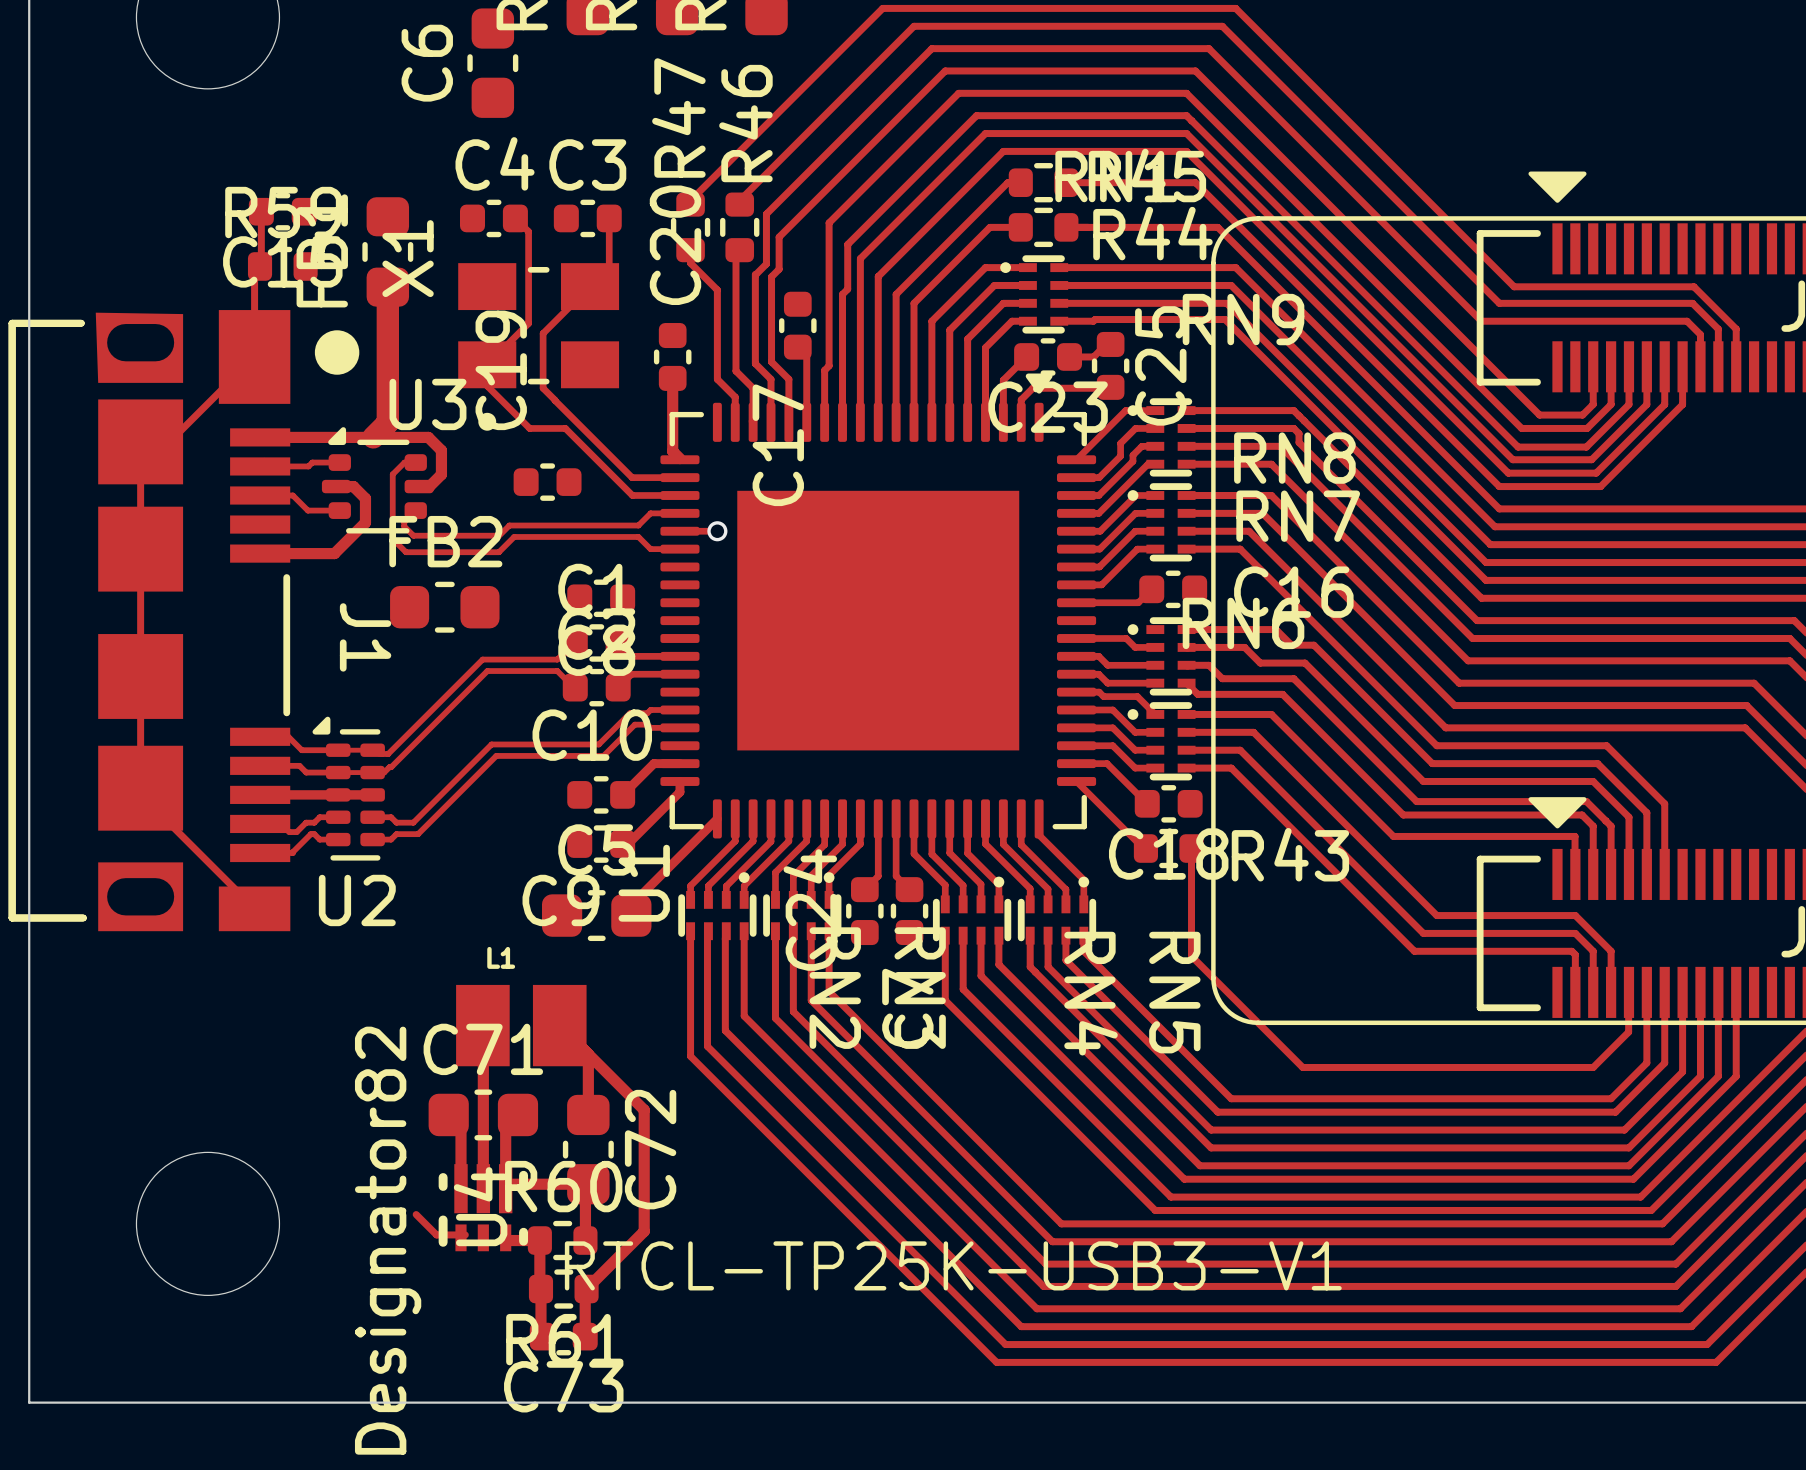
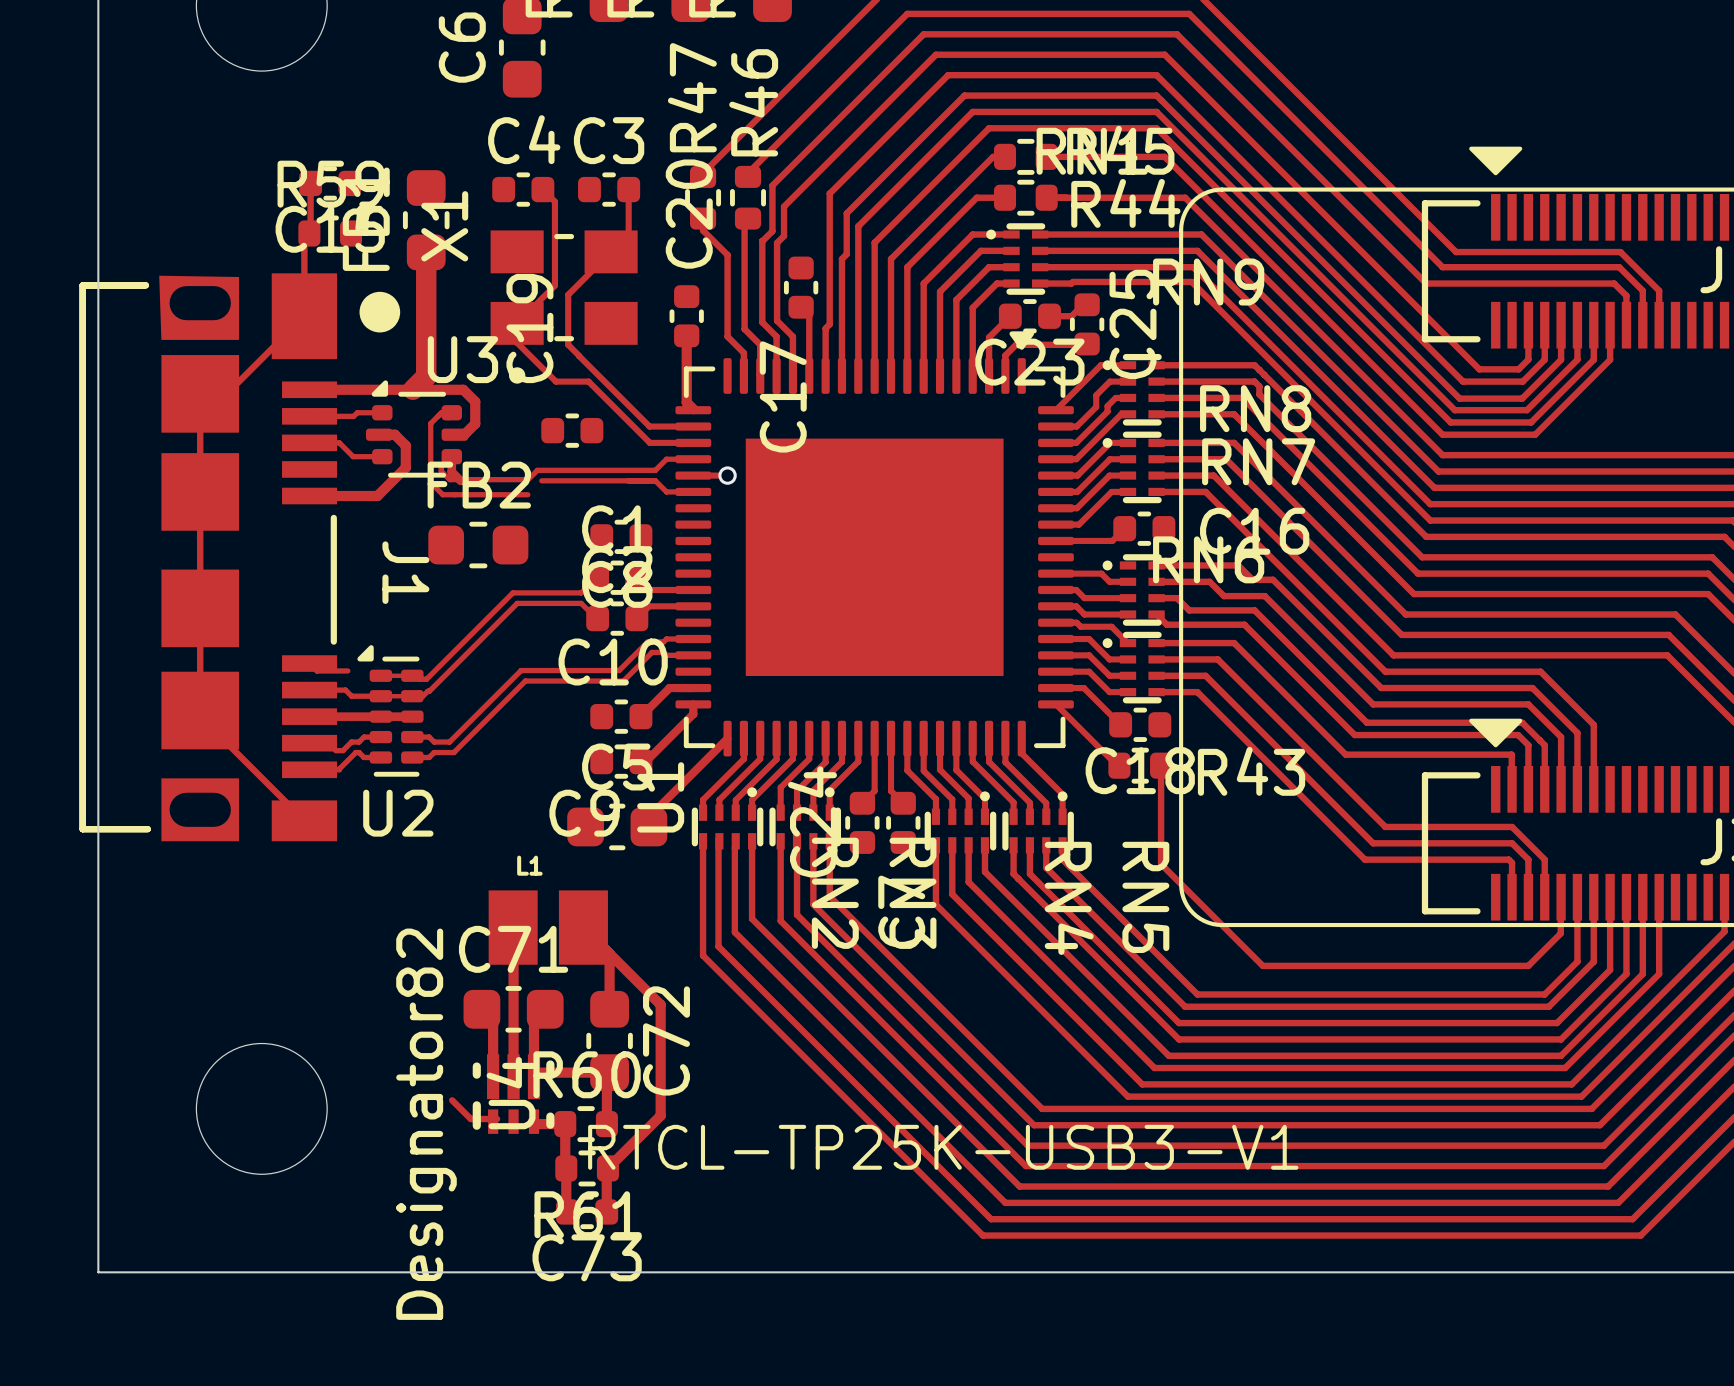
track: none -> (451, 456) (451, 471) (460, 480)
track: (514, 536) (498, 552) -> none
track: (260, 736) (288, 736) (301, 750) (332, 750) -> (309, 663) (316, 670) (347, 670)

